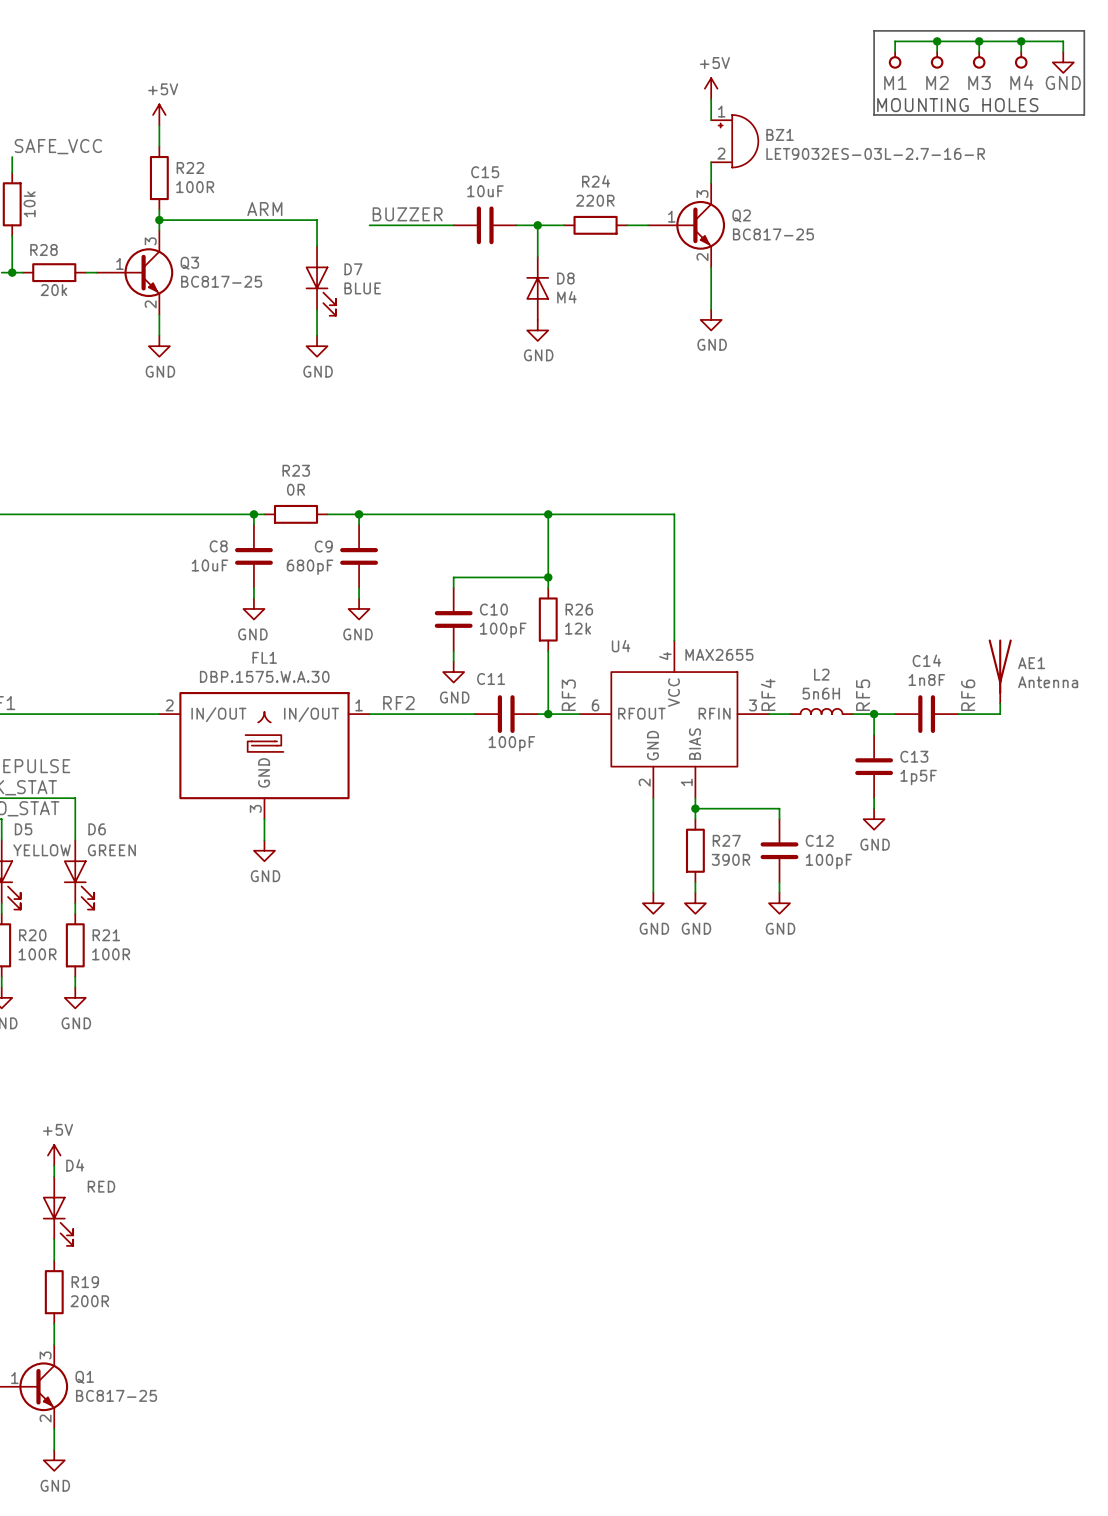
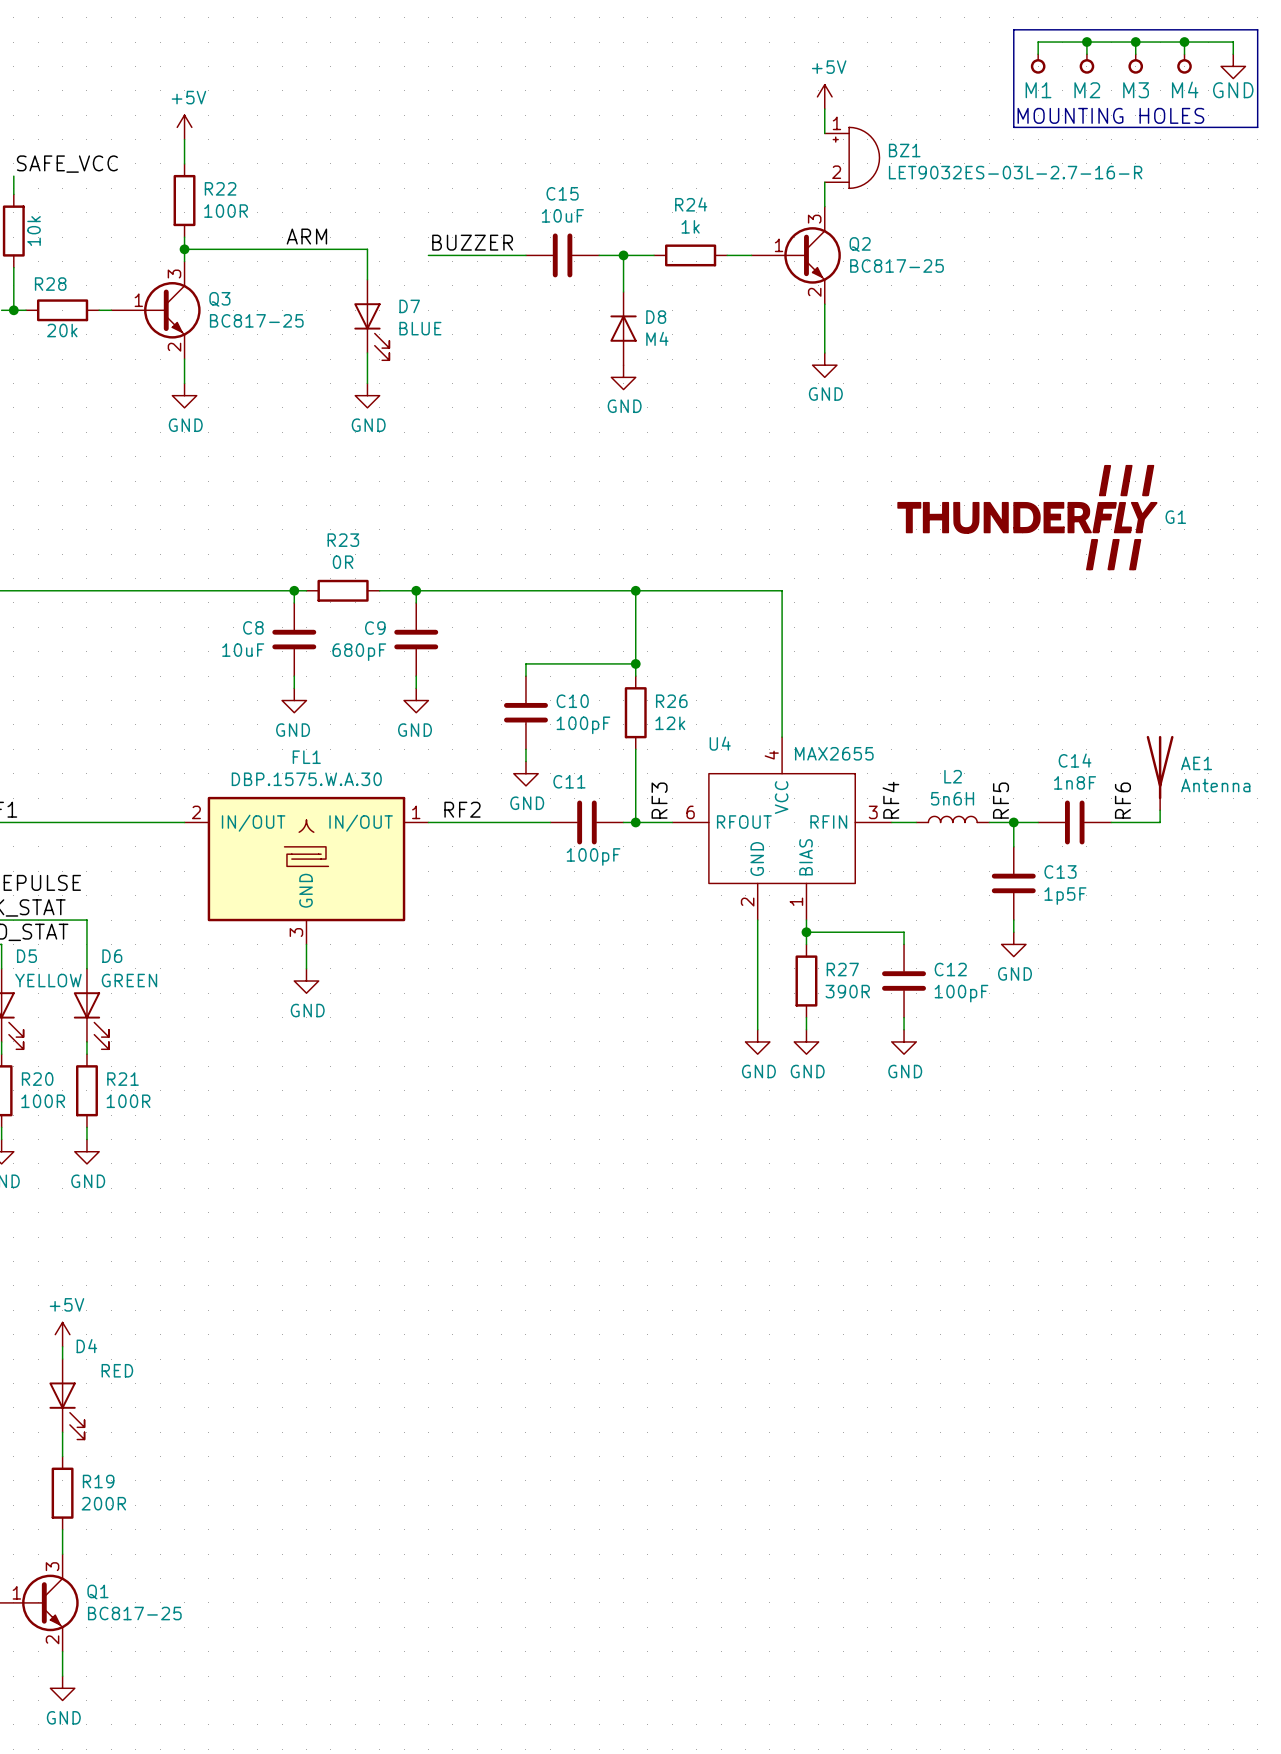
R24 value: 220R (595, 200) -> 1k (690, 226)
G1: none -> (1027, 517)

